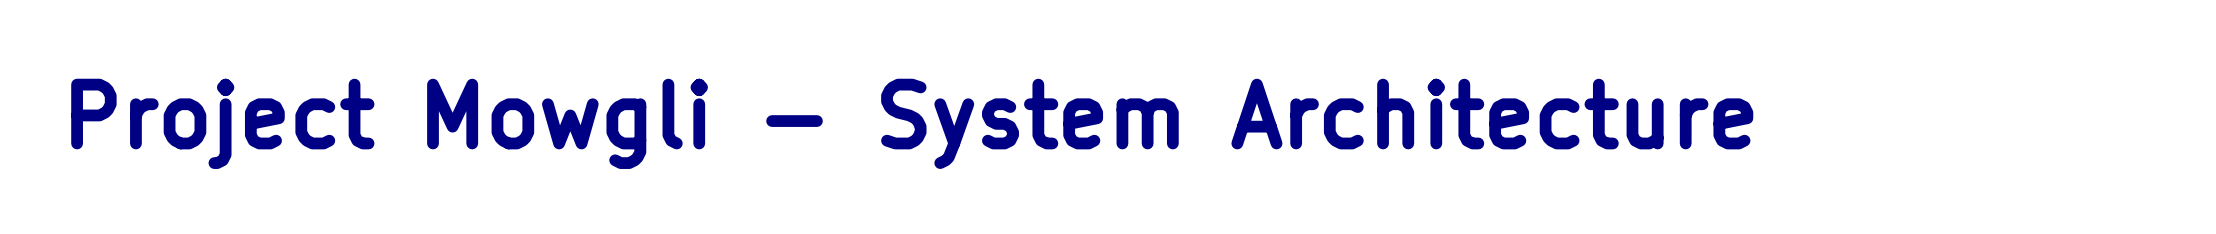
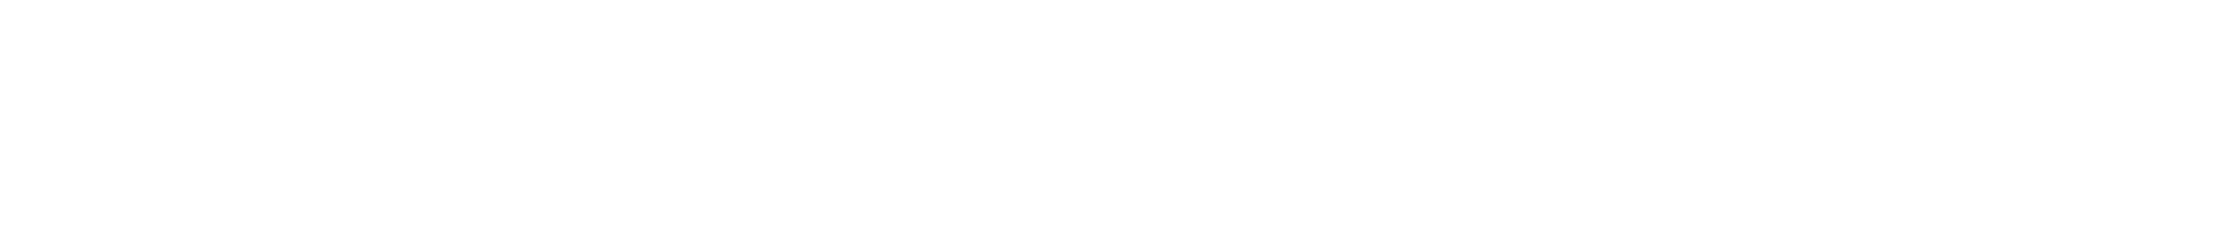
text: Project Mowgli - System Architecture (912, 123) -> none

